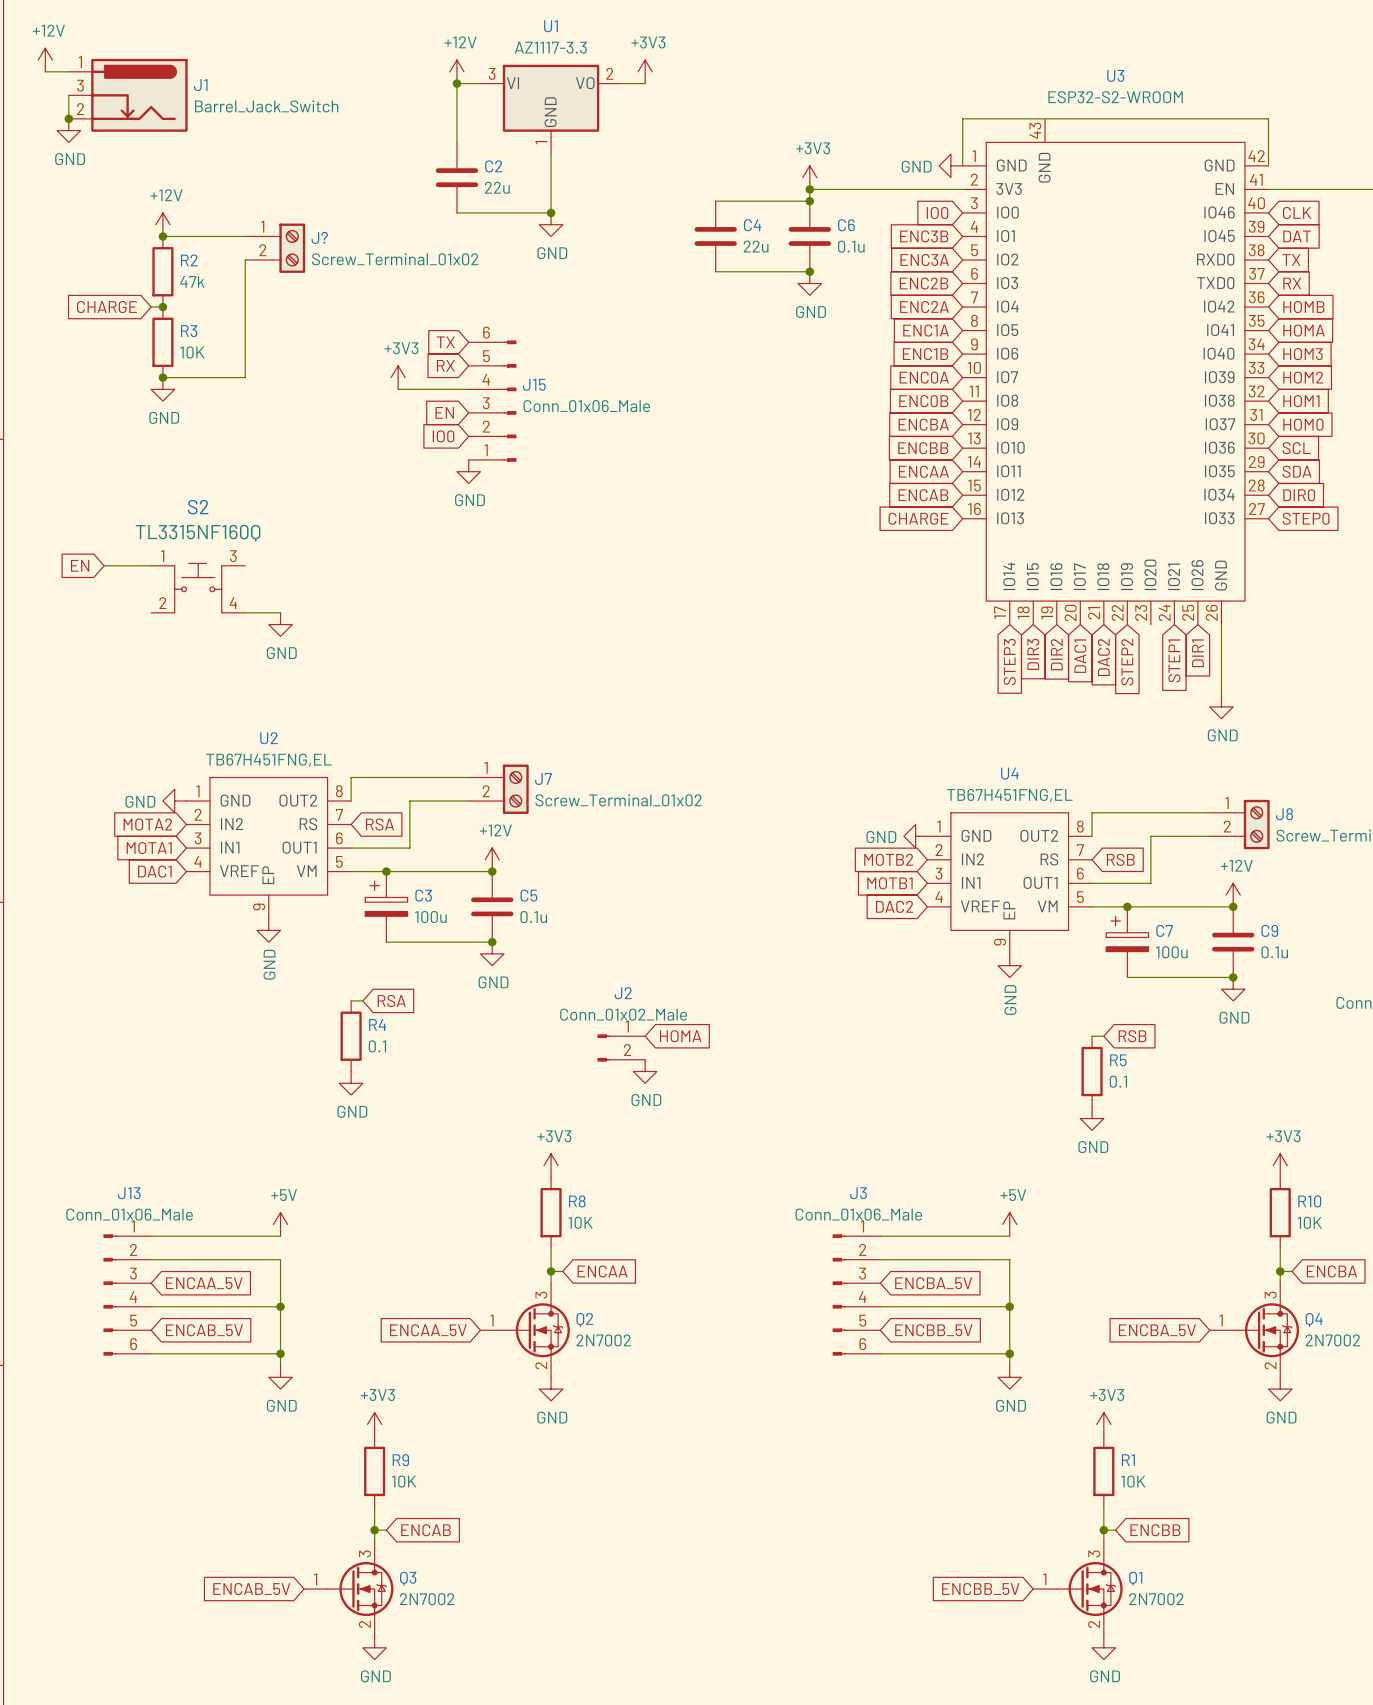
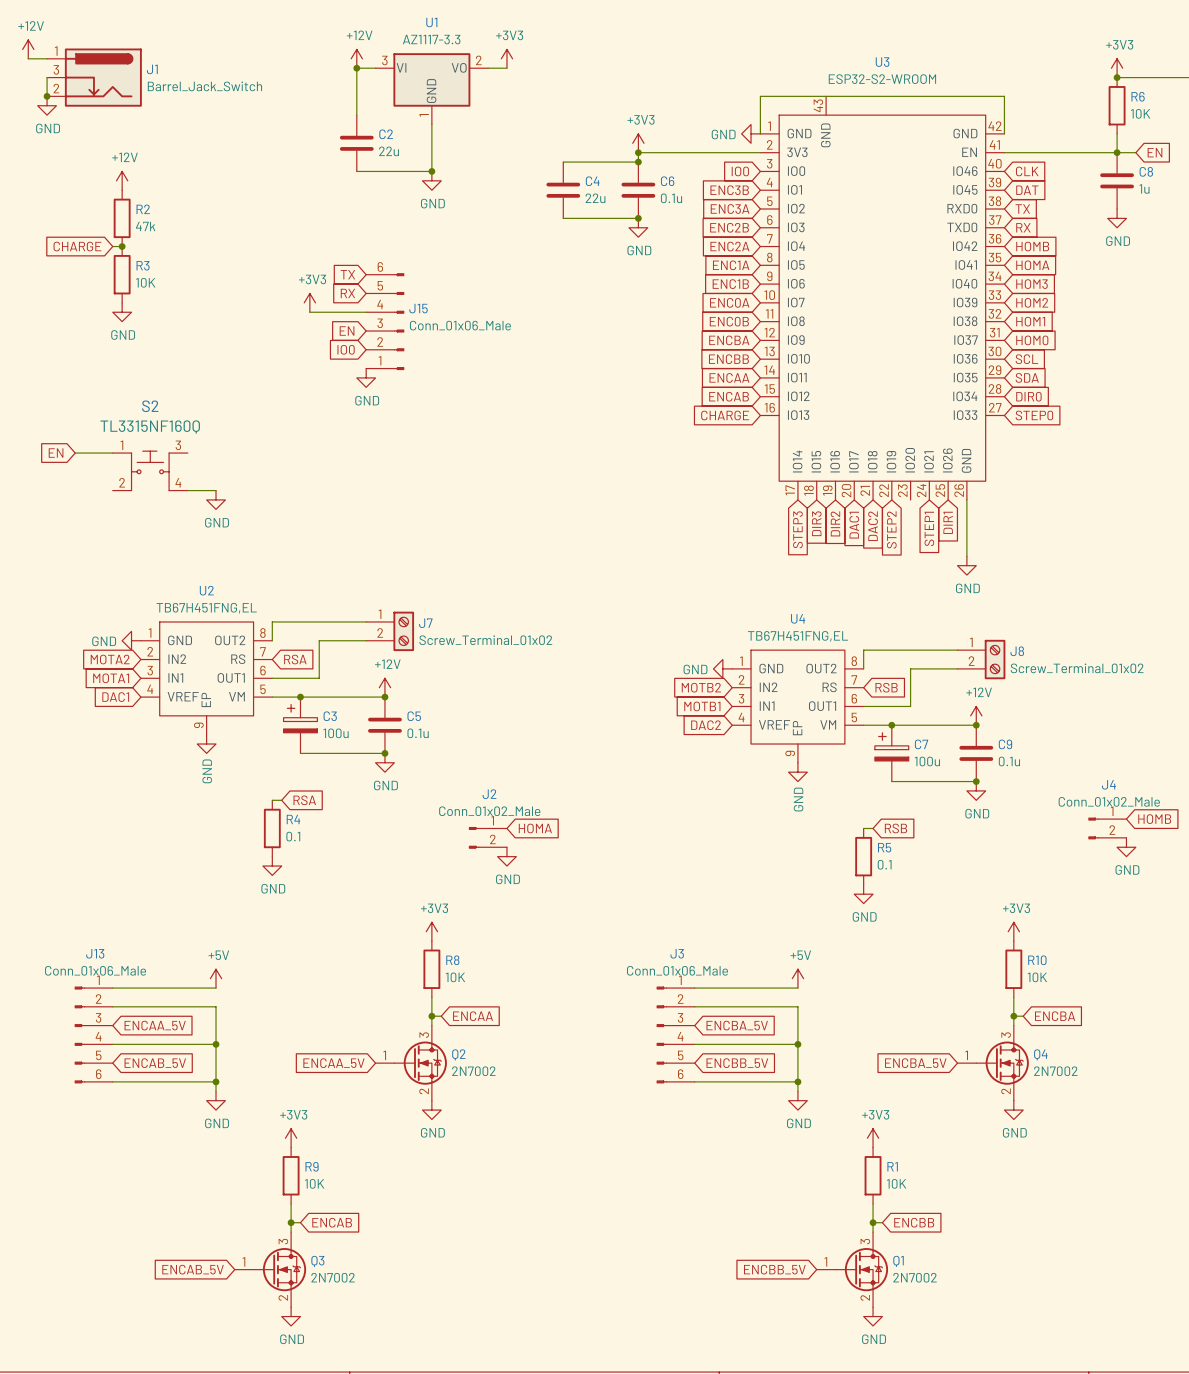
wire: (162, 236) (245, 236) -> none
junction: (162, 236) -> none
J?: Screw_Terminal_01x02 (275, 248) -> none
wire: (245, 259) (245, 377) (162, 377) -> none
junction: (162, 377) -> none

